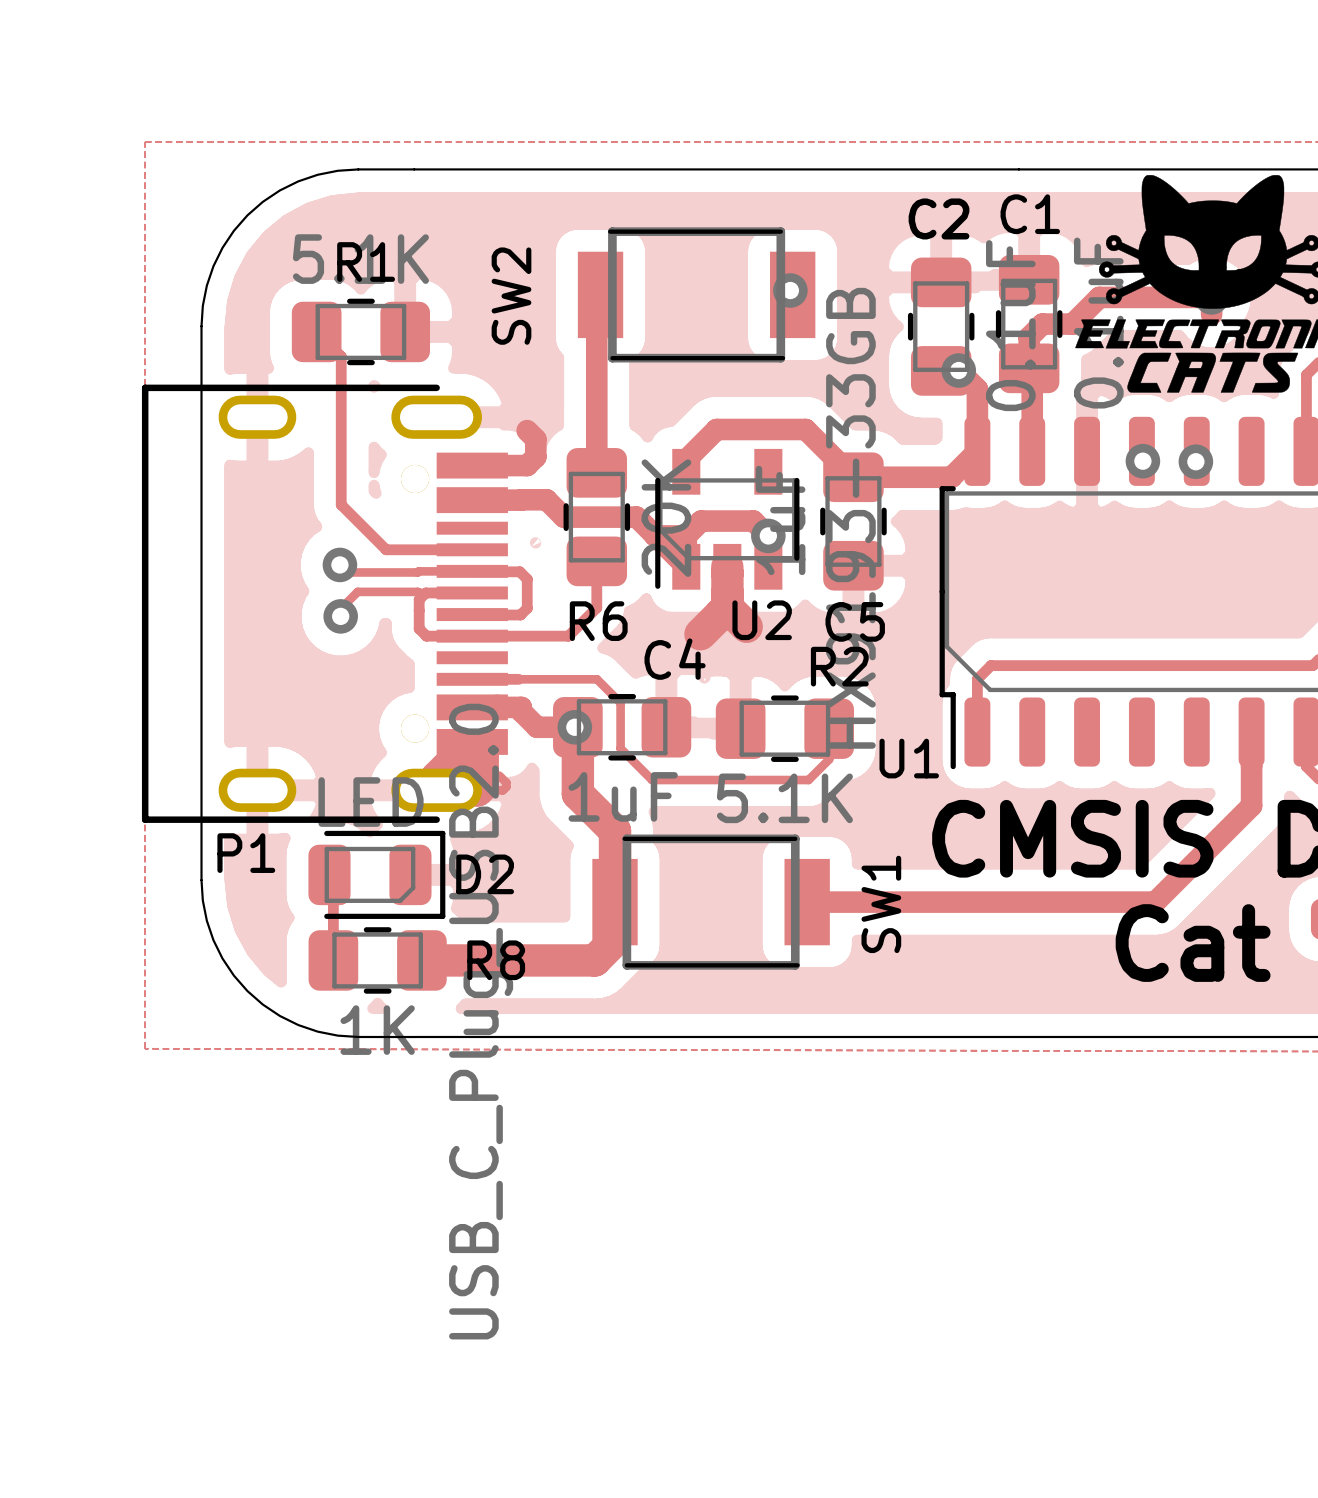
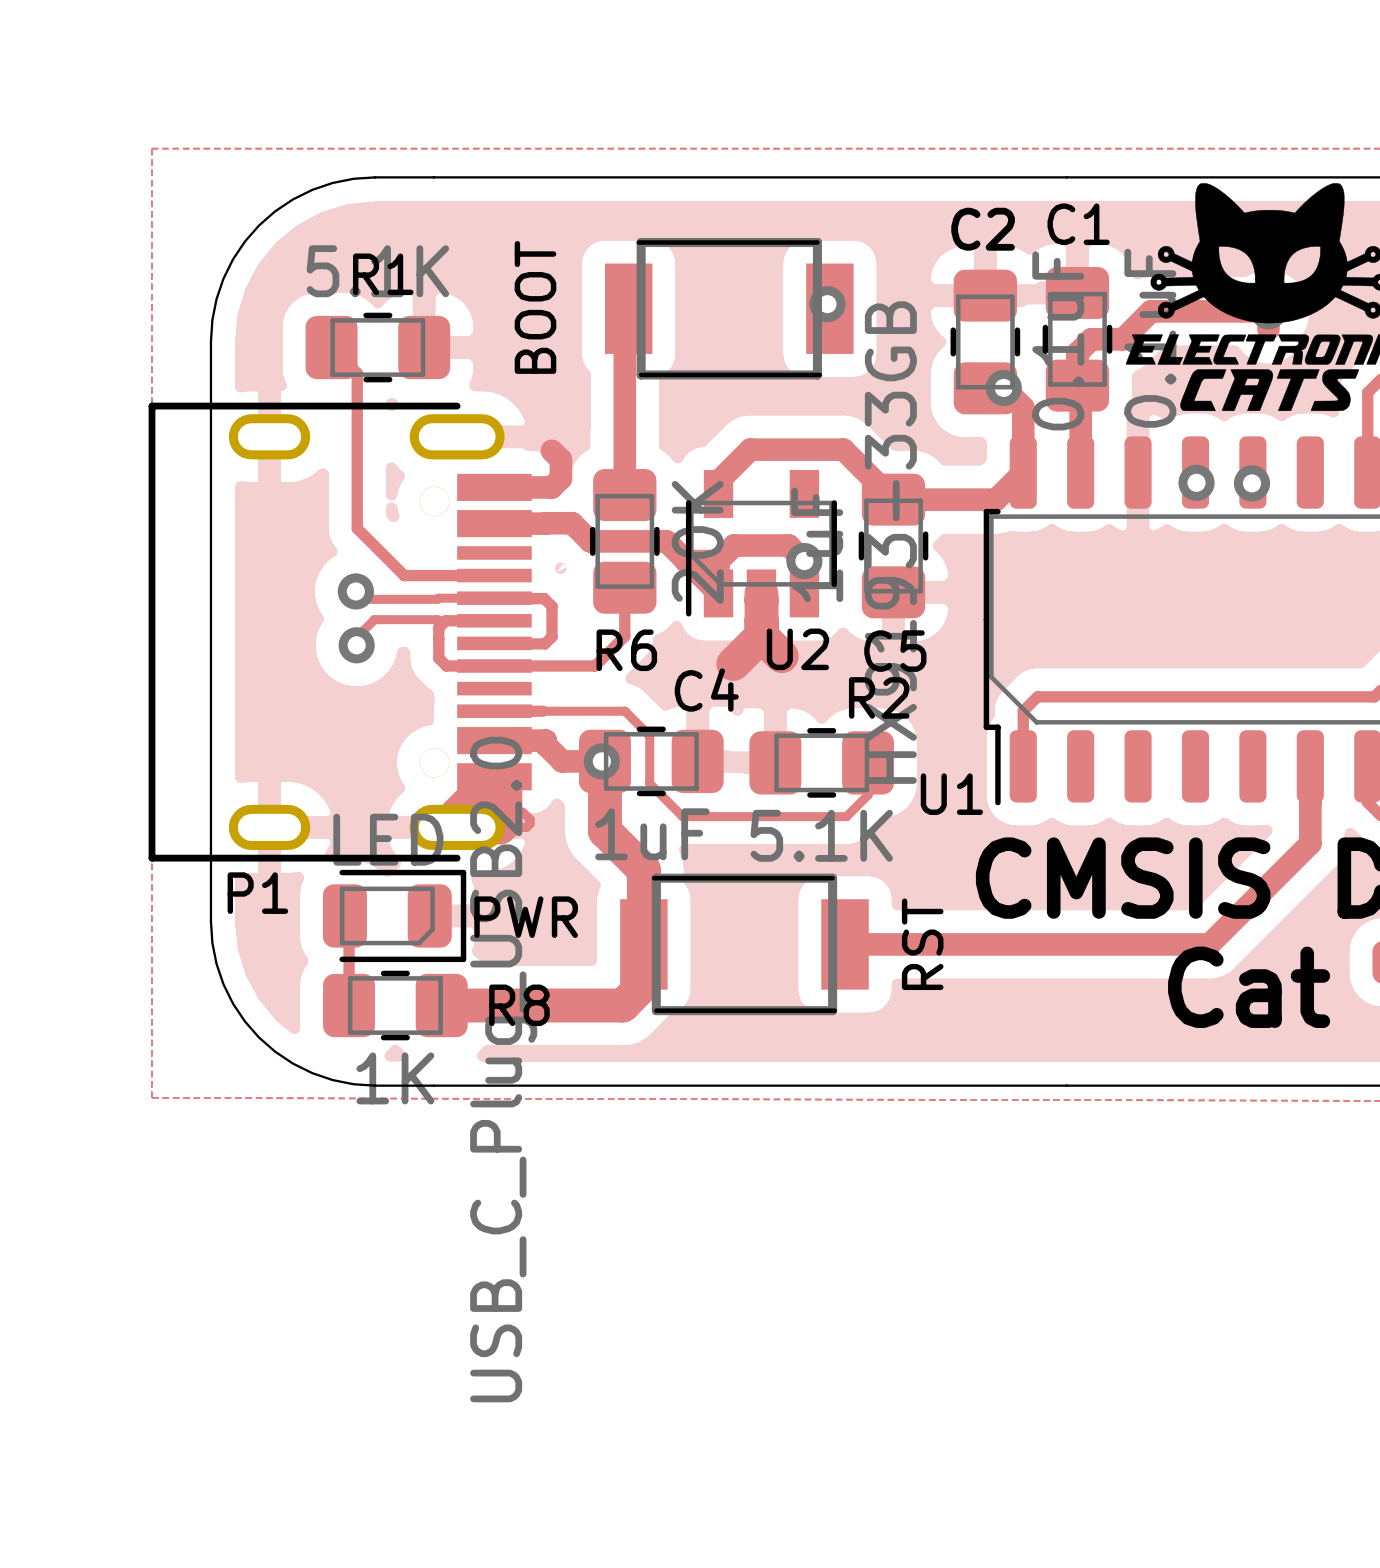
SW2 name: SW2 (511, 296) -> BOOT (535, 307)
D2 name: D2 (485, 874) -> PWR (526, 917)
SW1 name: SW1 (881, 904) -> RST (922, 944)

